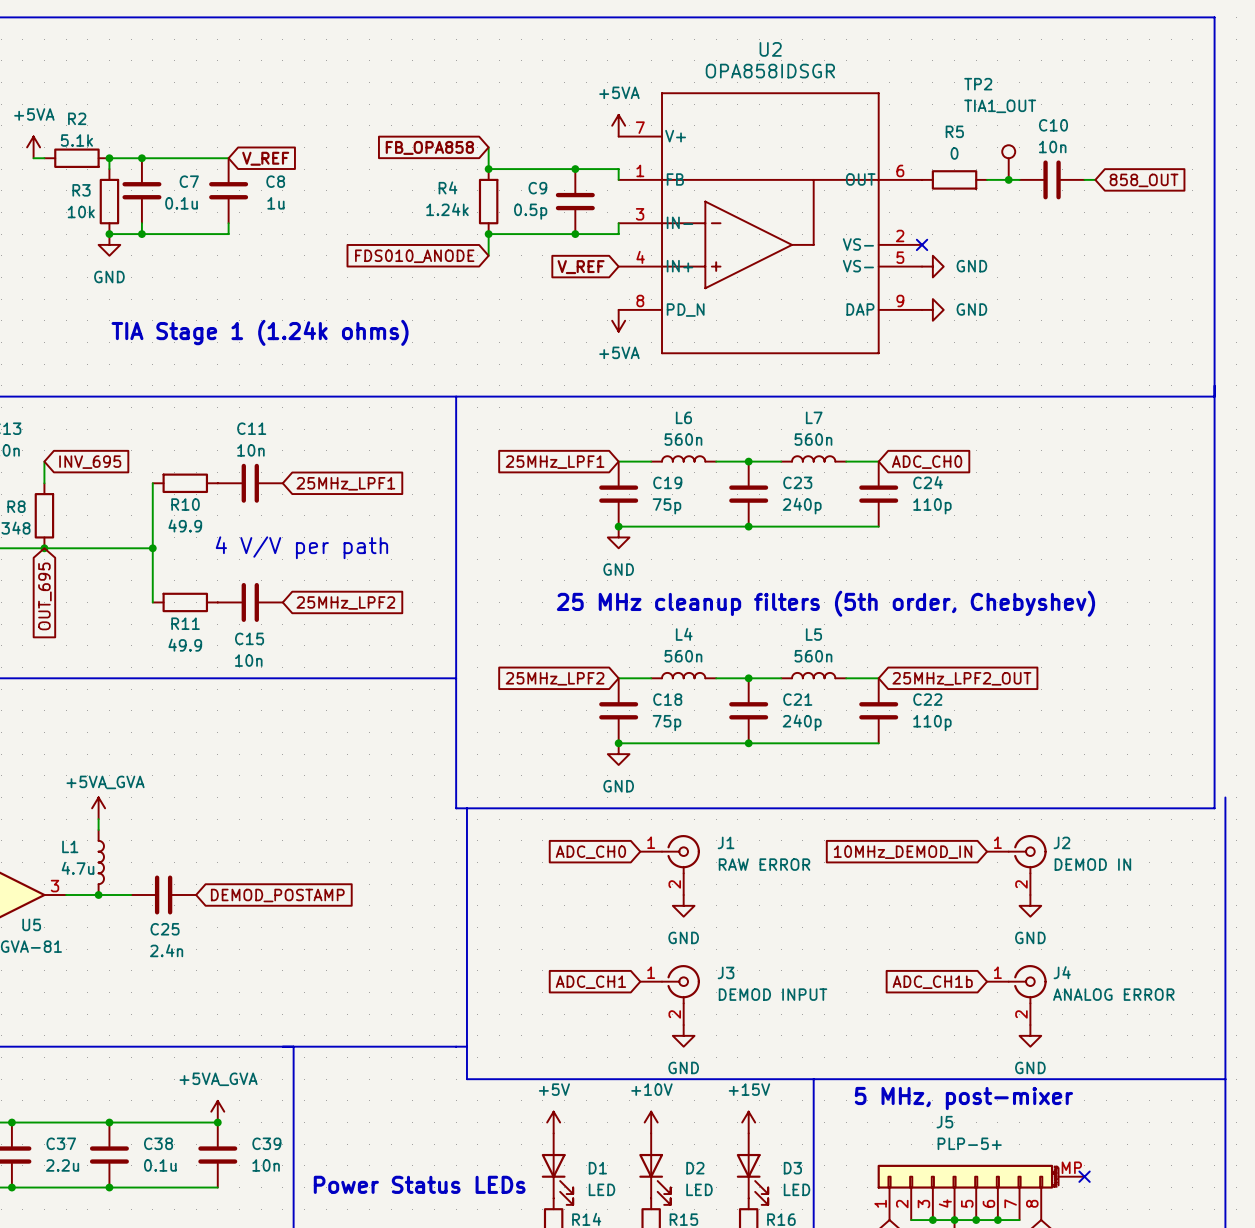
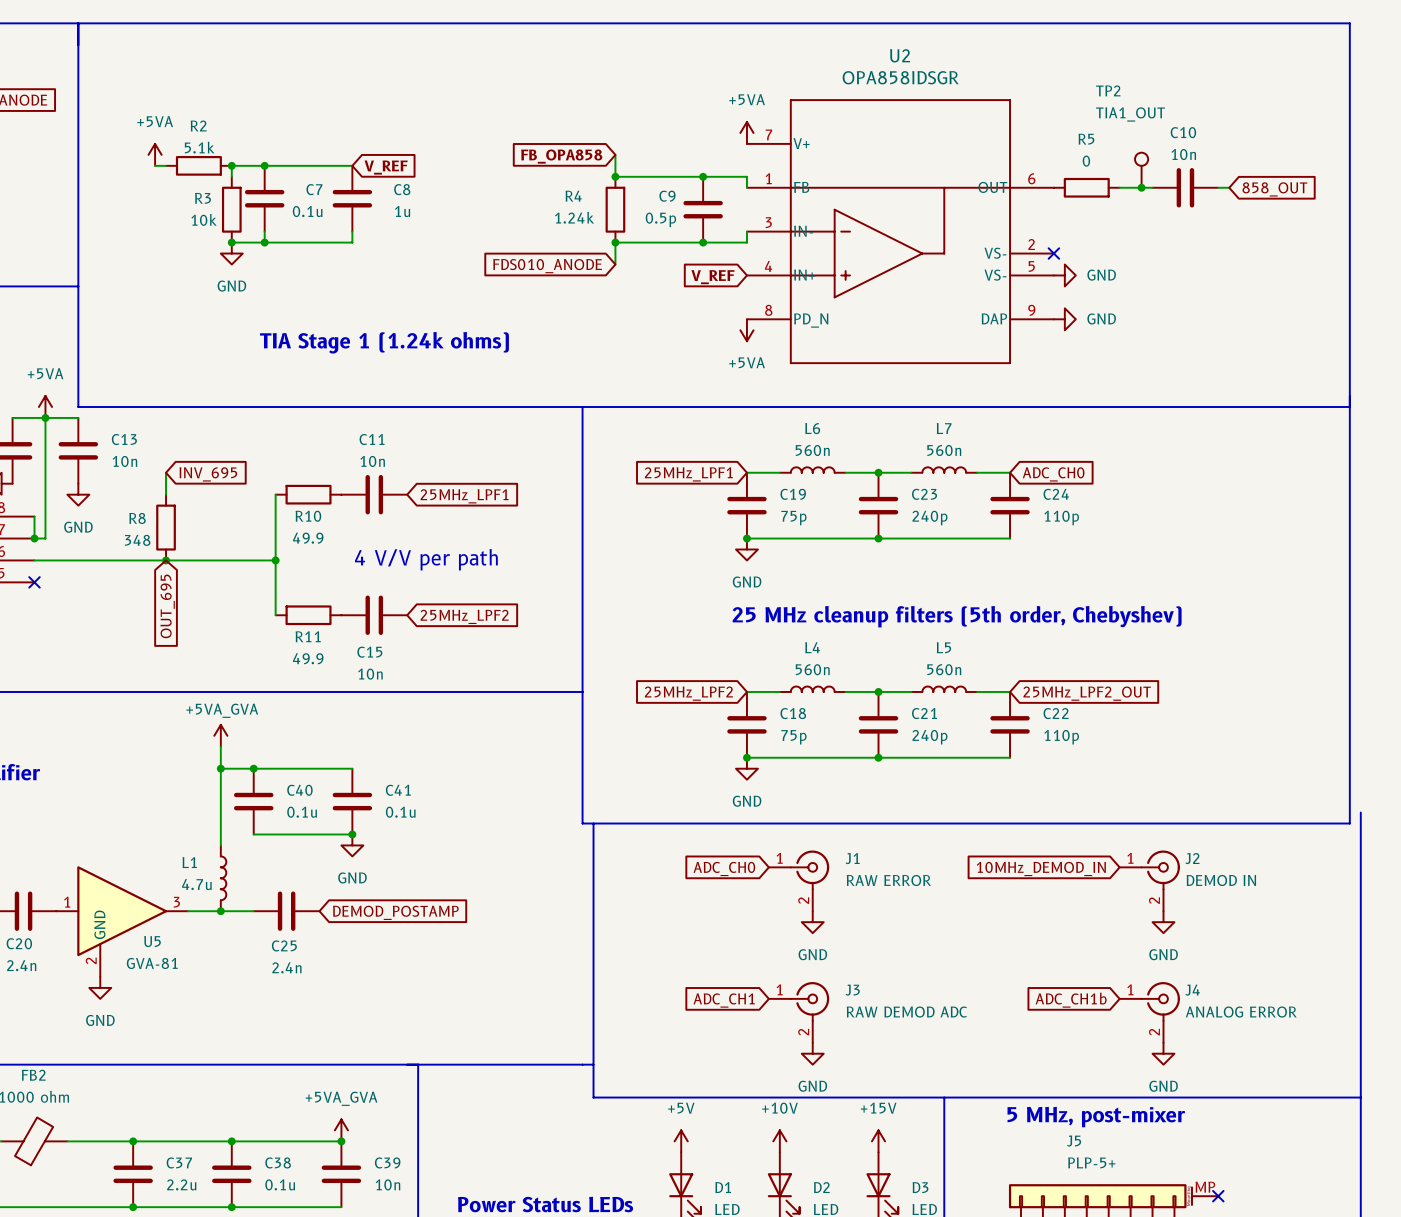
wire: none -> (220, 746) (220, 834)
wire: none -> (220, 768) (352, 768)
junction: none -> (220, 768)
junction: none -> (253, 768)
C40: none -> 0.1u (253, 801)
C41: none -> 0.1u (352, 801)
power symbol position: +5VA_GVA (98, 808) -> +5VA_GVA (220, 735)
wire: none -> (253, 834) (352, 834)
junction: none -> (352, 834)
power symbol: none -> GND (352, 845)
J3 value: DEMOD INPUT (773, 994) -> RAW DEMOD ADC (906, 1012)

